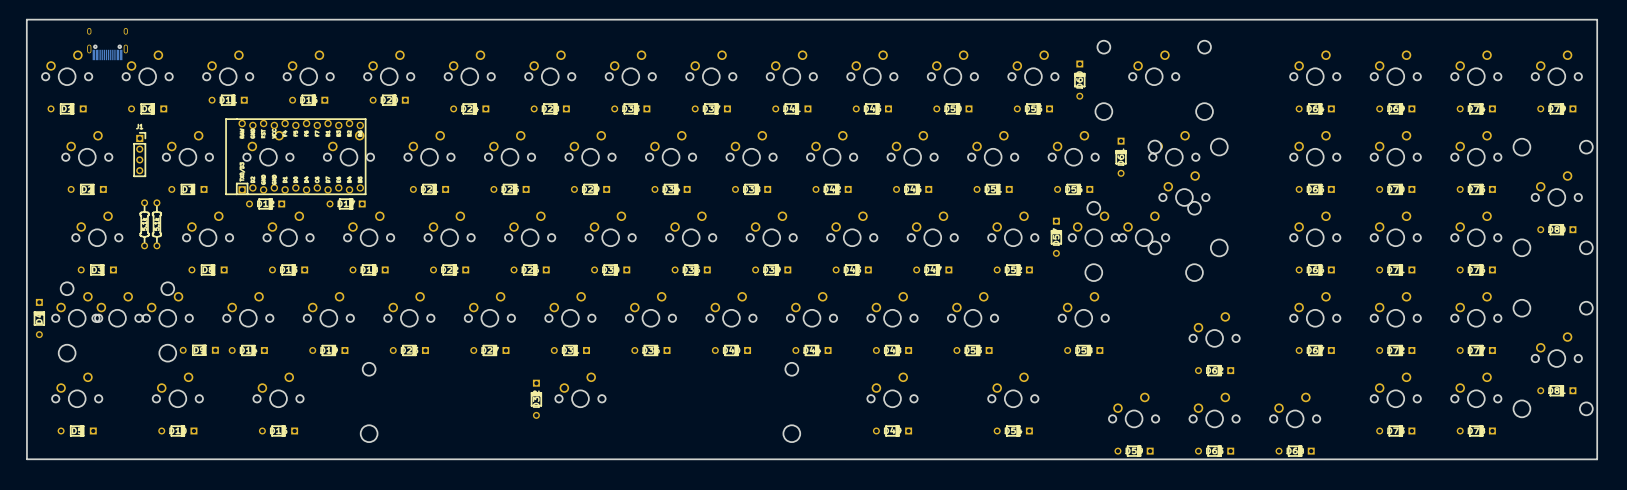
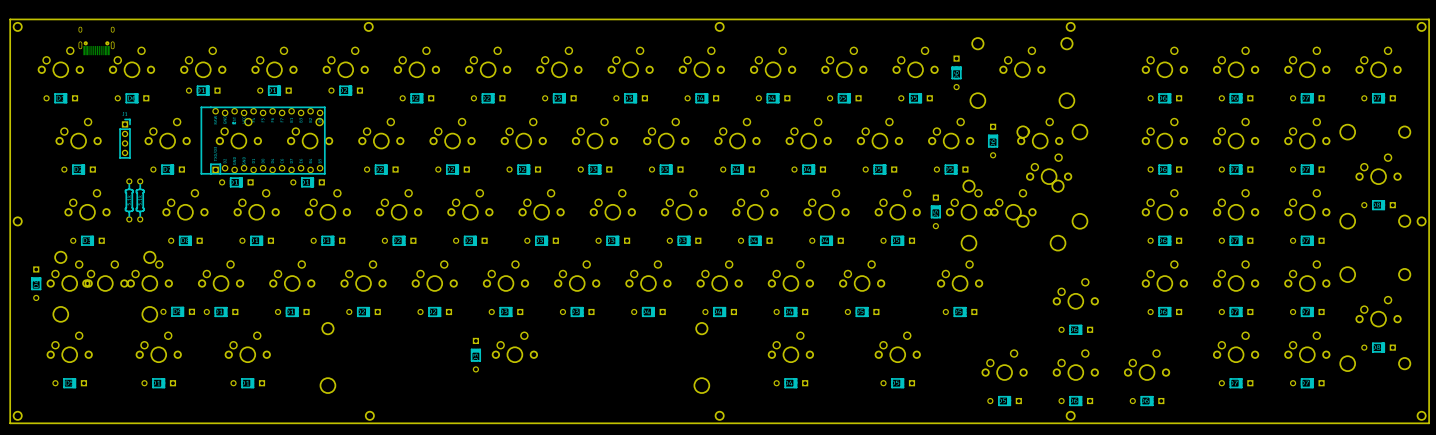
board edge: (26, 19) (26, 459) (1597, 459) (1597, 19) (26, 19) -> (10, 19) (10, 423) (1429, 423) (1429, 19) (10, 19)
part: none -> (17, 26)
part: none -> (368, 26)
part: none -> (719, 26)
part: none -> (1070, 26)
part: none -> (1421, 26)
part: none -> (17, 221)
part: none -> (1421, 221)
part: none -> (17, 415)
part: none -> (369, 415)
part: none -> (719, 415)
part: none -> (1070, 415)
part: none -> (1421, 415)

